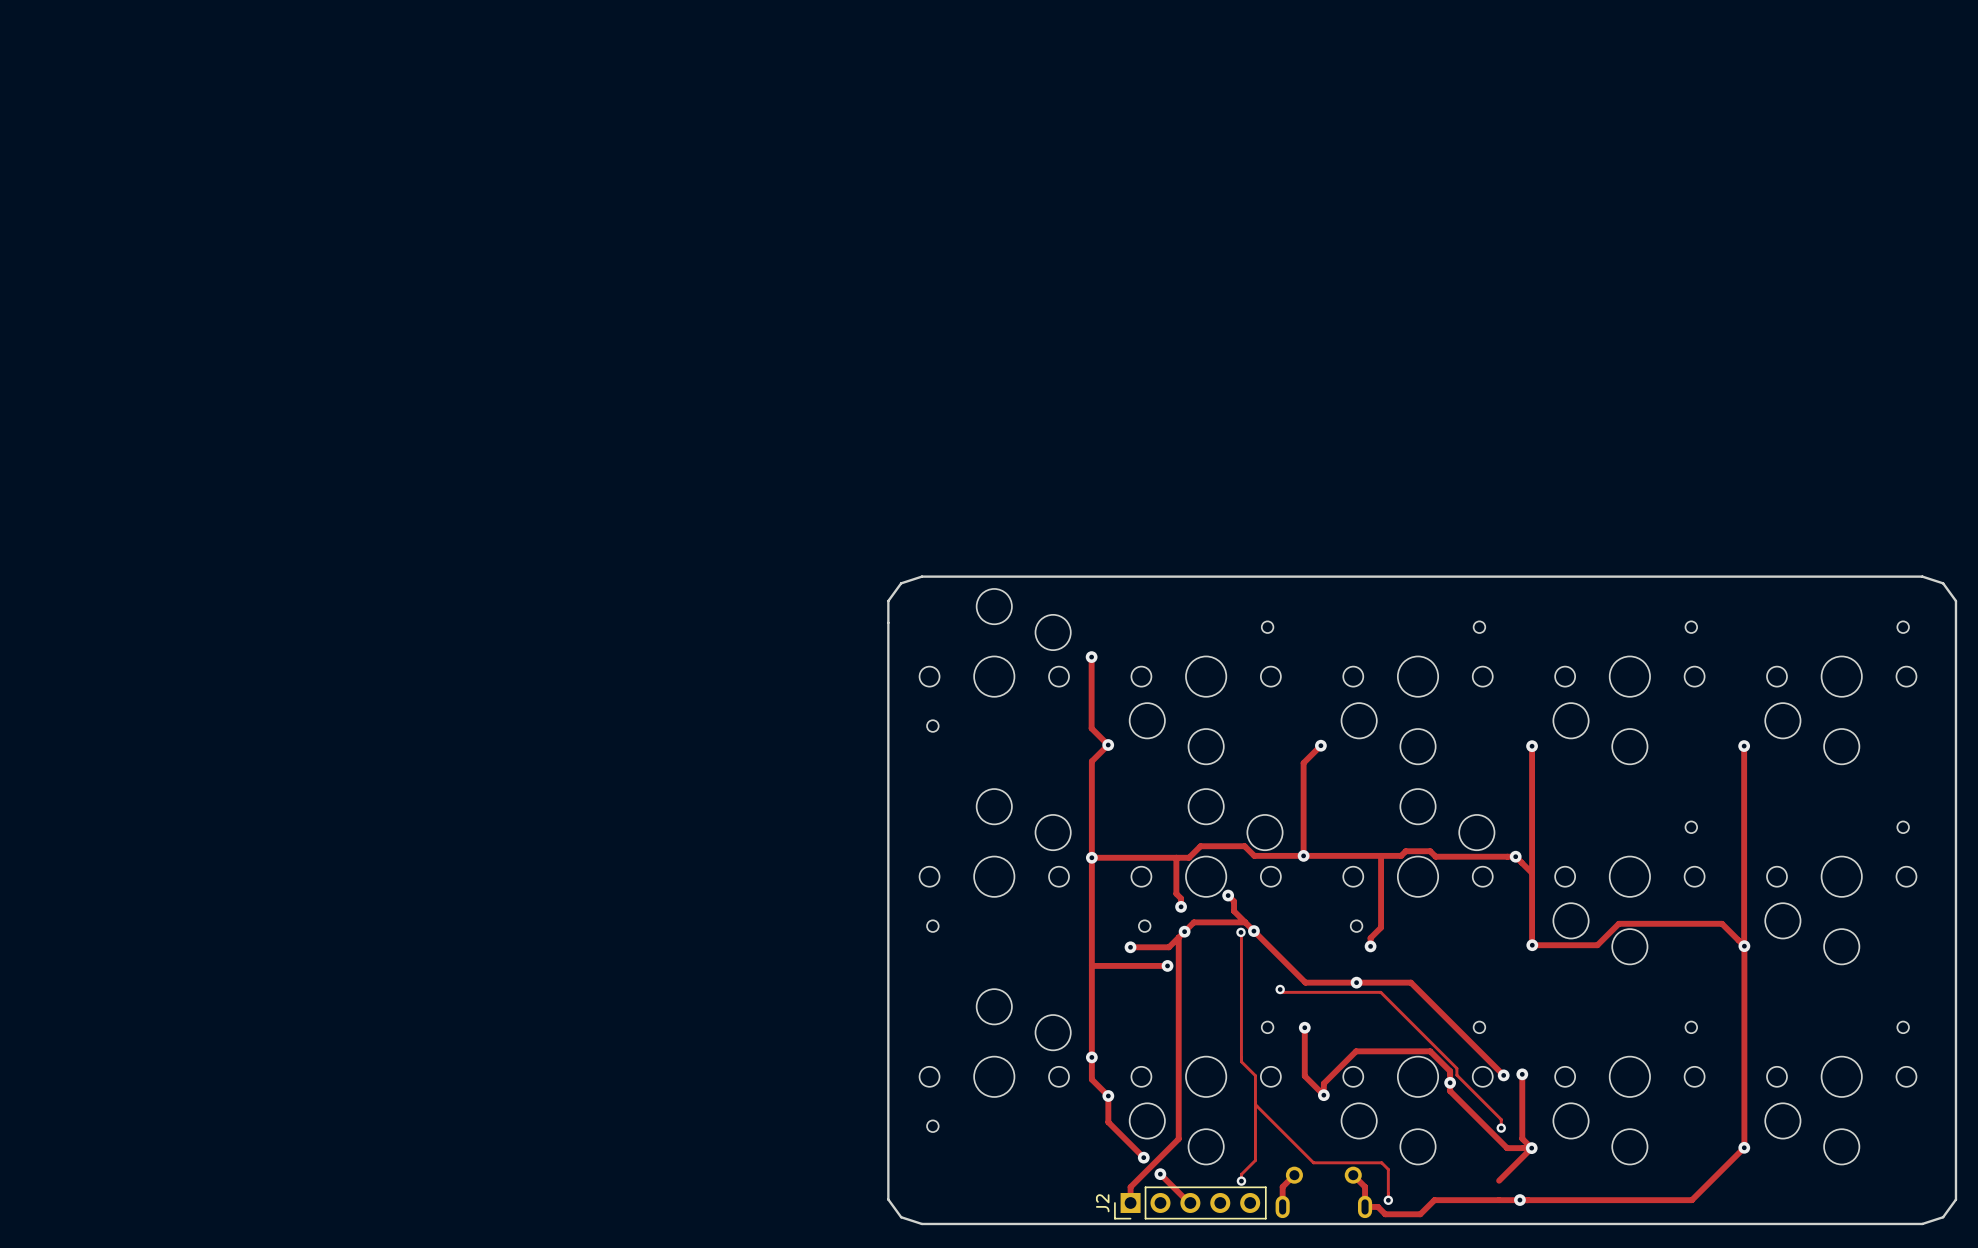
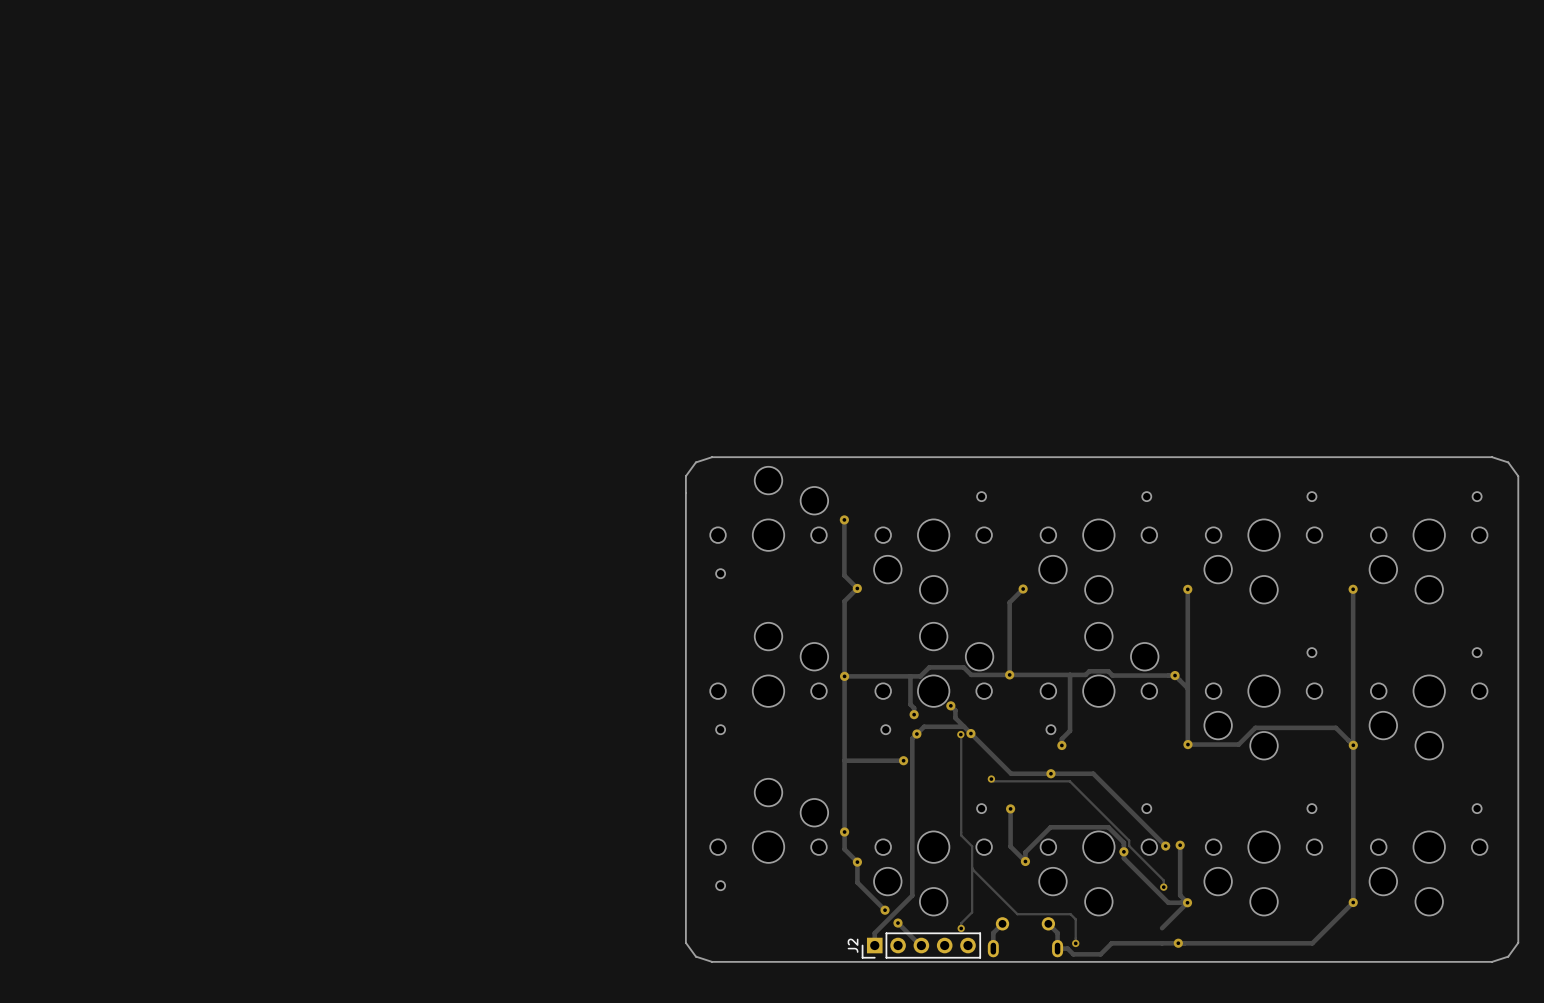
track: (1178, 937) (1169, 947) (1130, 947) -> none
via: (1130, 947) -> none

